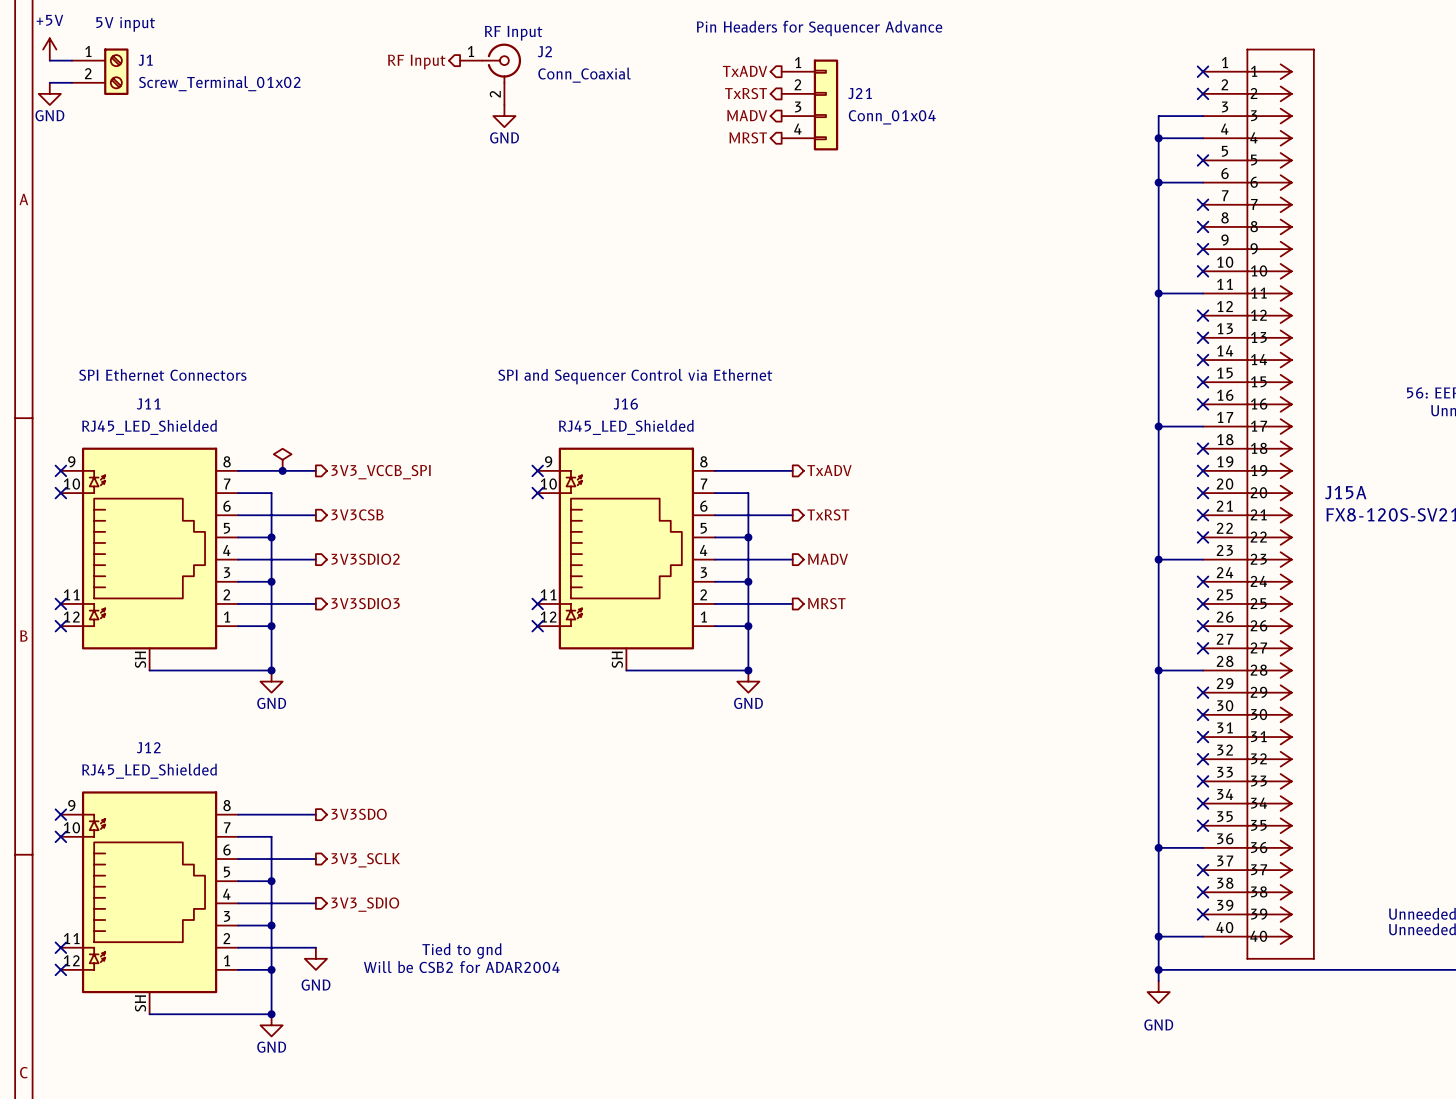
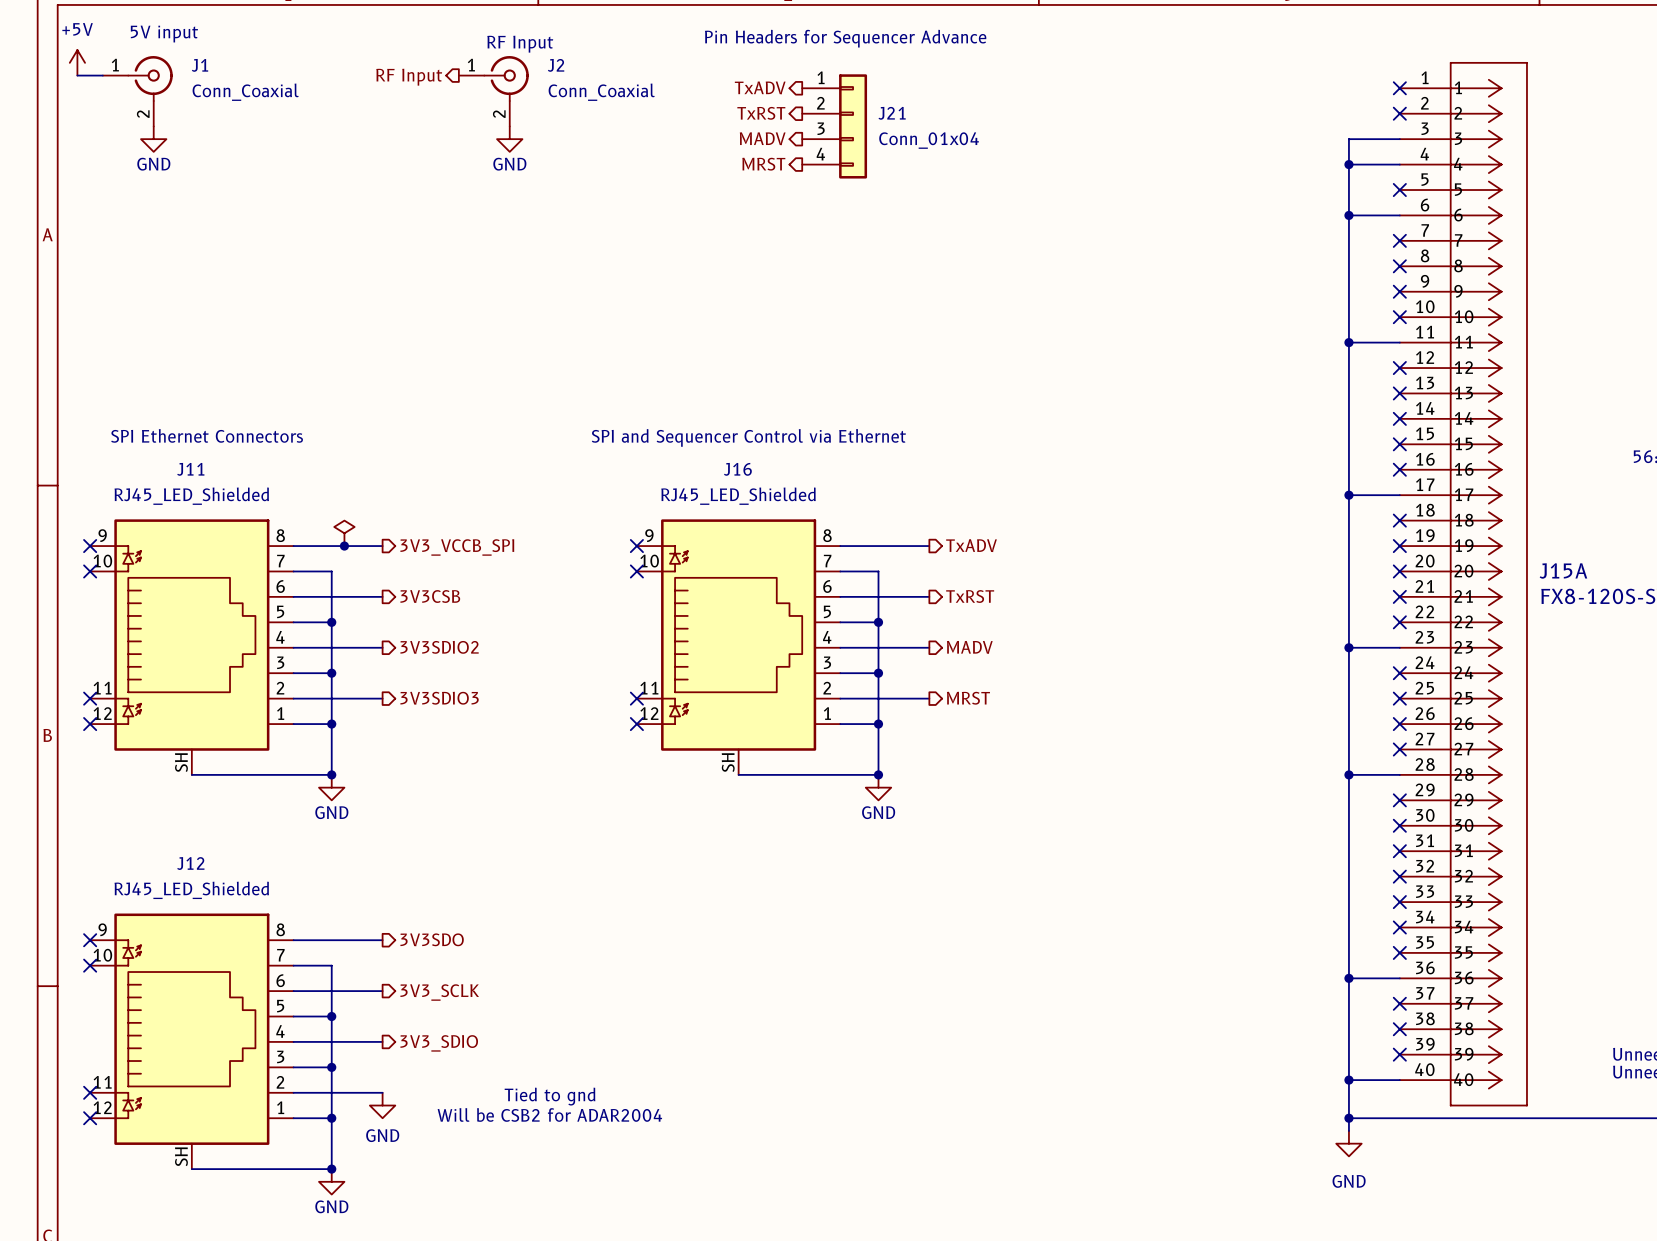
text position: Pin Headers for Sequencer Advance (819, 28) -> Pin Headers for Sequencer Advance (845, 38)
text position: RF Input (513, 33) -> RF Input (520, 44)
J1 symbol: [71, 48, 129, 96] -> [102, 56, 173, 127]
hierarchical label position: RF Input (416, 62) -> RF Input (409, 77)
hierarchical label position: TxADV (745, 71) -> TxADV (760, 87)
J2 position: (490, 74) -> (493, 91)
wire: (49, 82) (71, 82) -> none
J1 value: Screw_Terminal_01x02 (219, 83) -> Conn_Coaxial (245, 92)
power symbol position: GND (49, 93) -> GND (153, 139)
hierarchical label position: TxRST (746, 93) -> TxRST (761, 113)
J21 position: (809, 104) -> (834, 126)
hierarchical label position: MADV (747, 115) -> MADV (762, 138)
power symbol position: GND (504, 116) -> GND (509, 139)
hierarchical label position: MRST (748, 137) -> MRST (763, 164)

